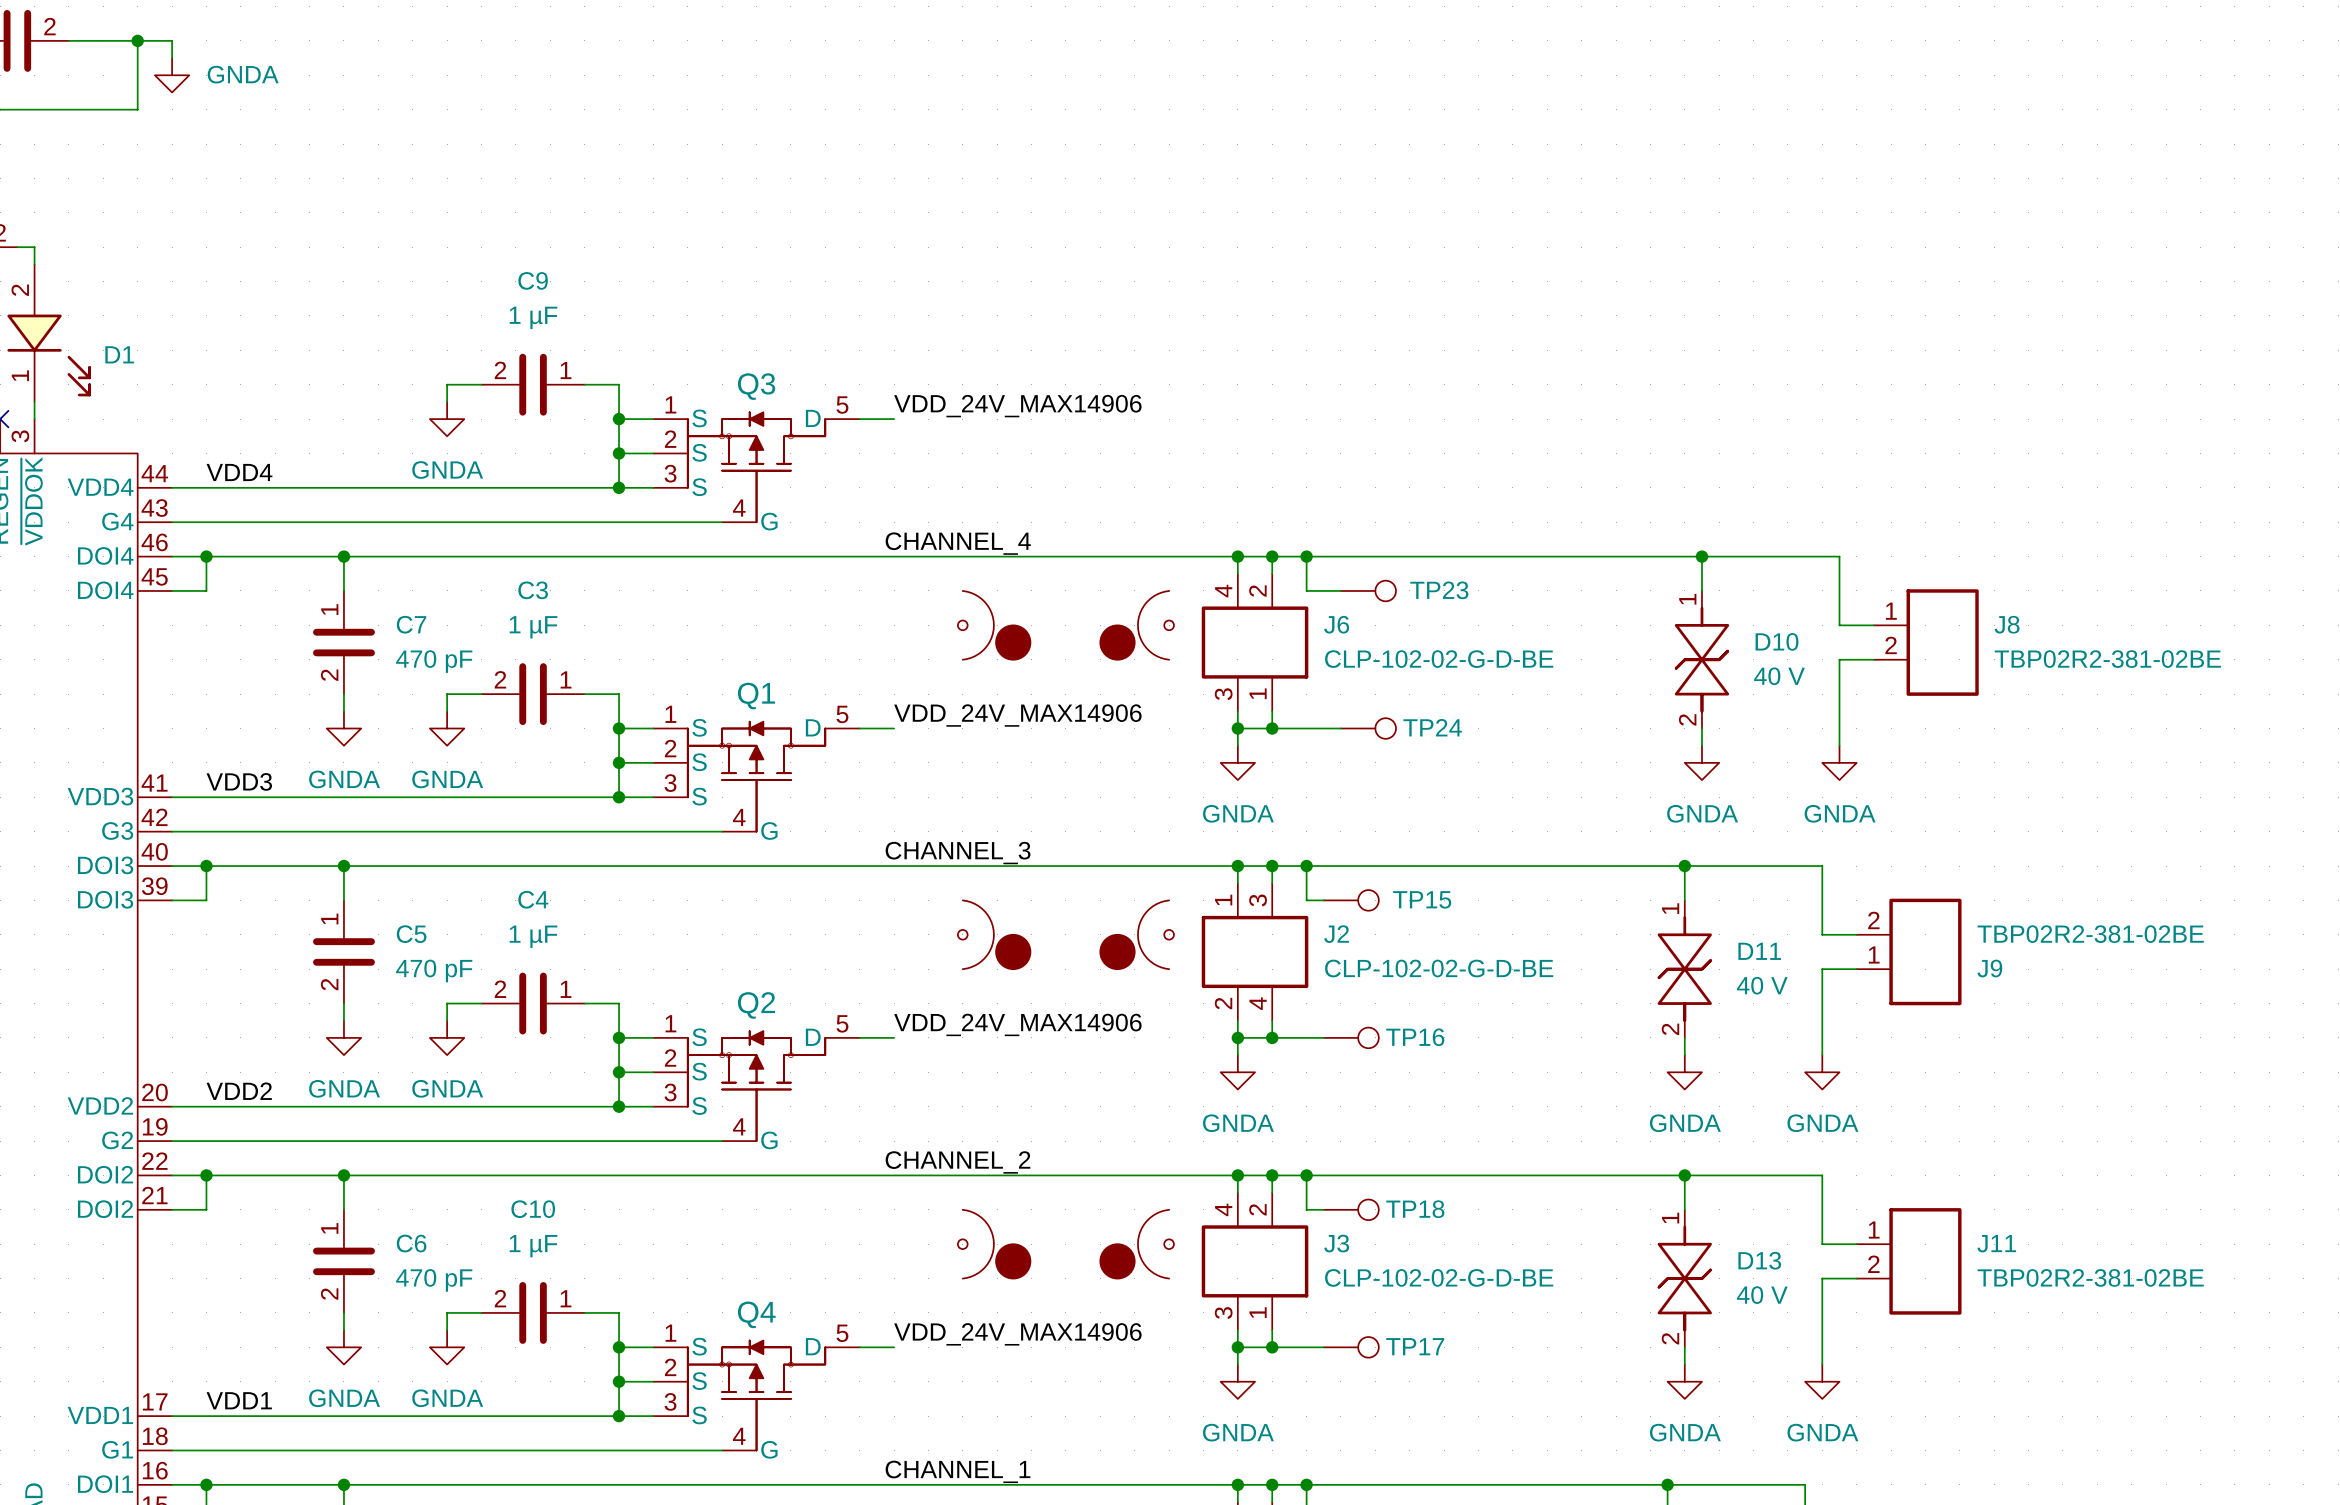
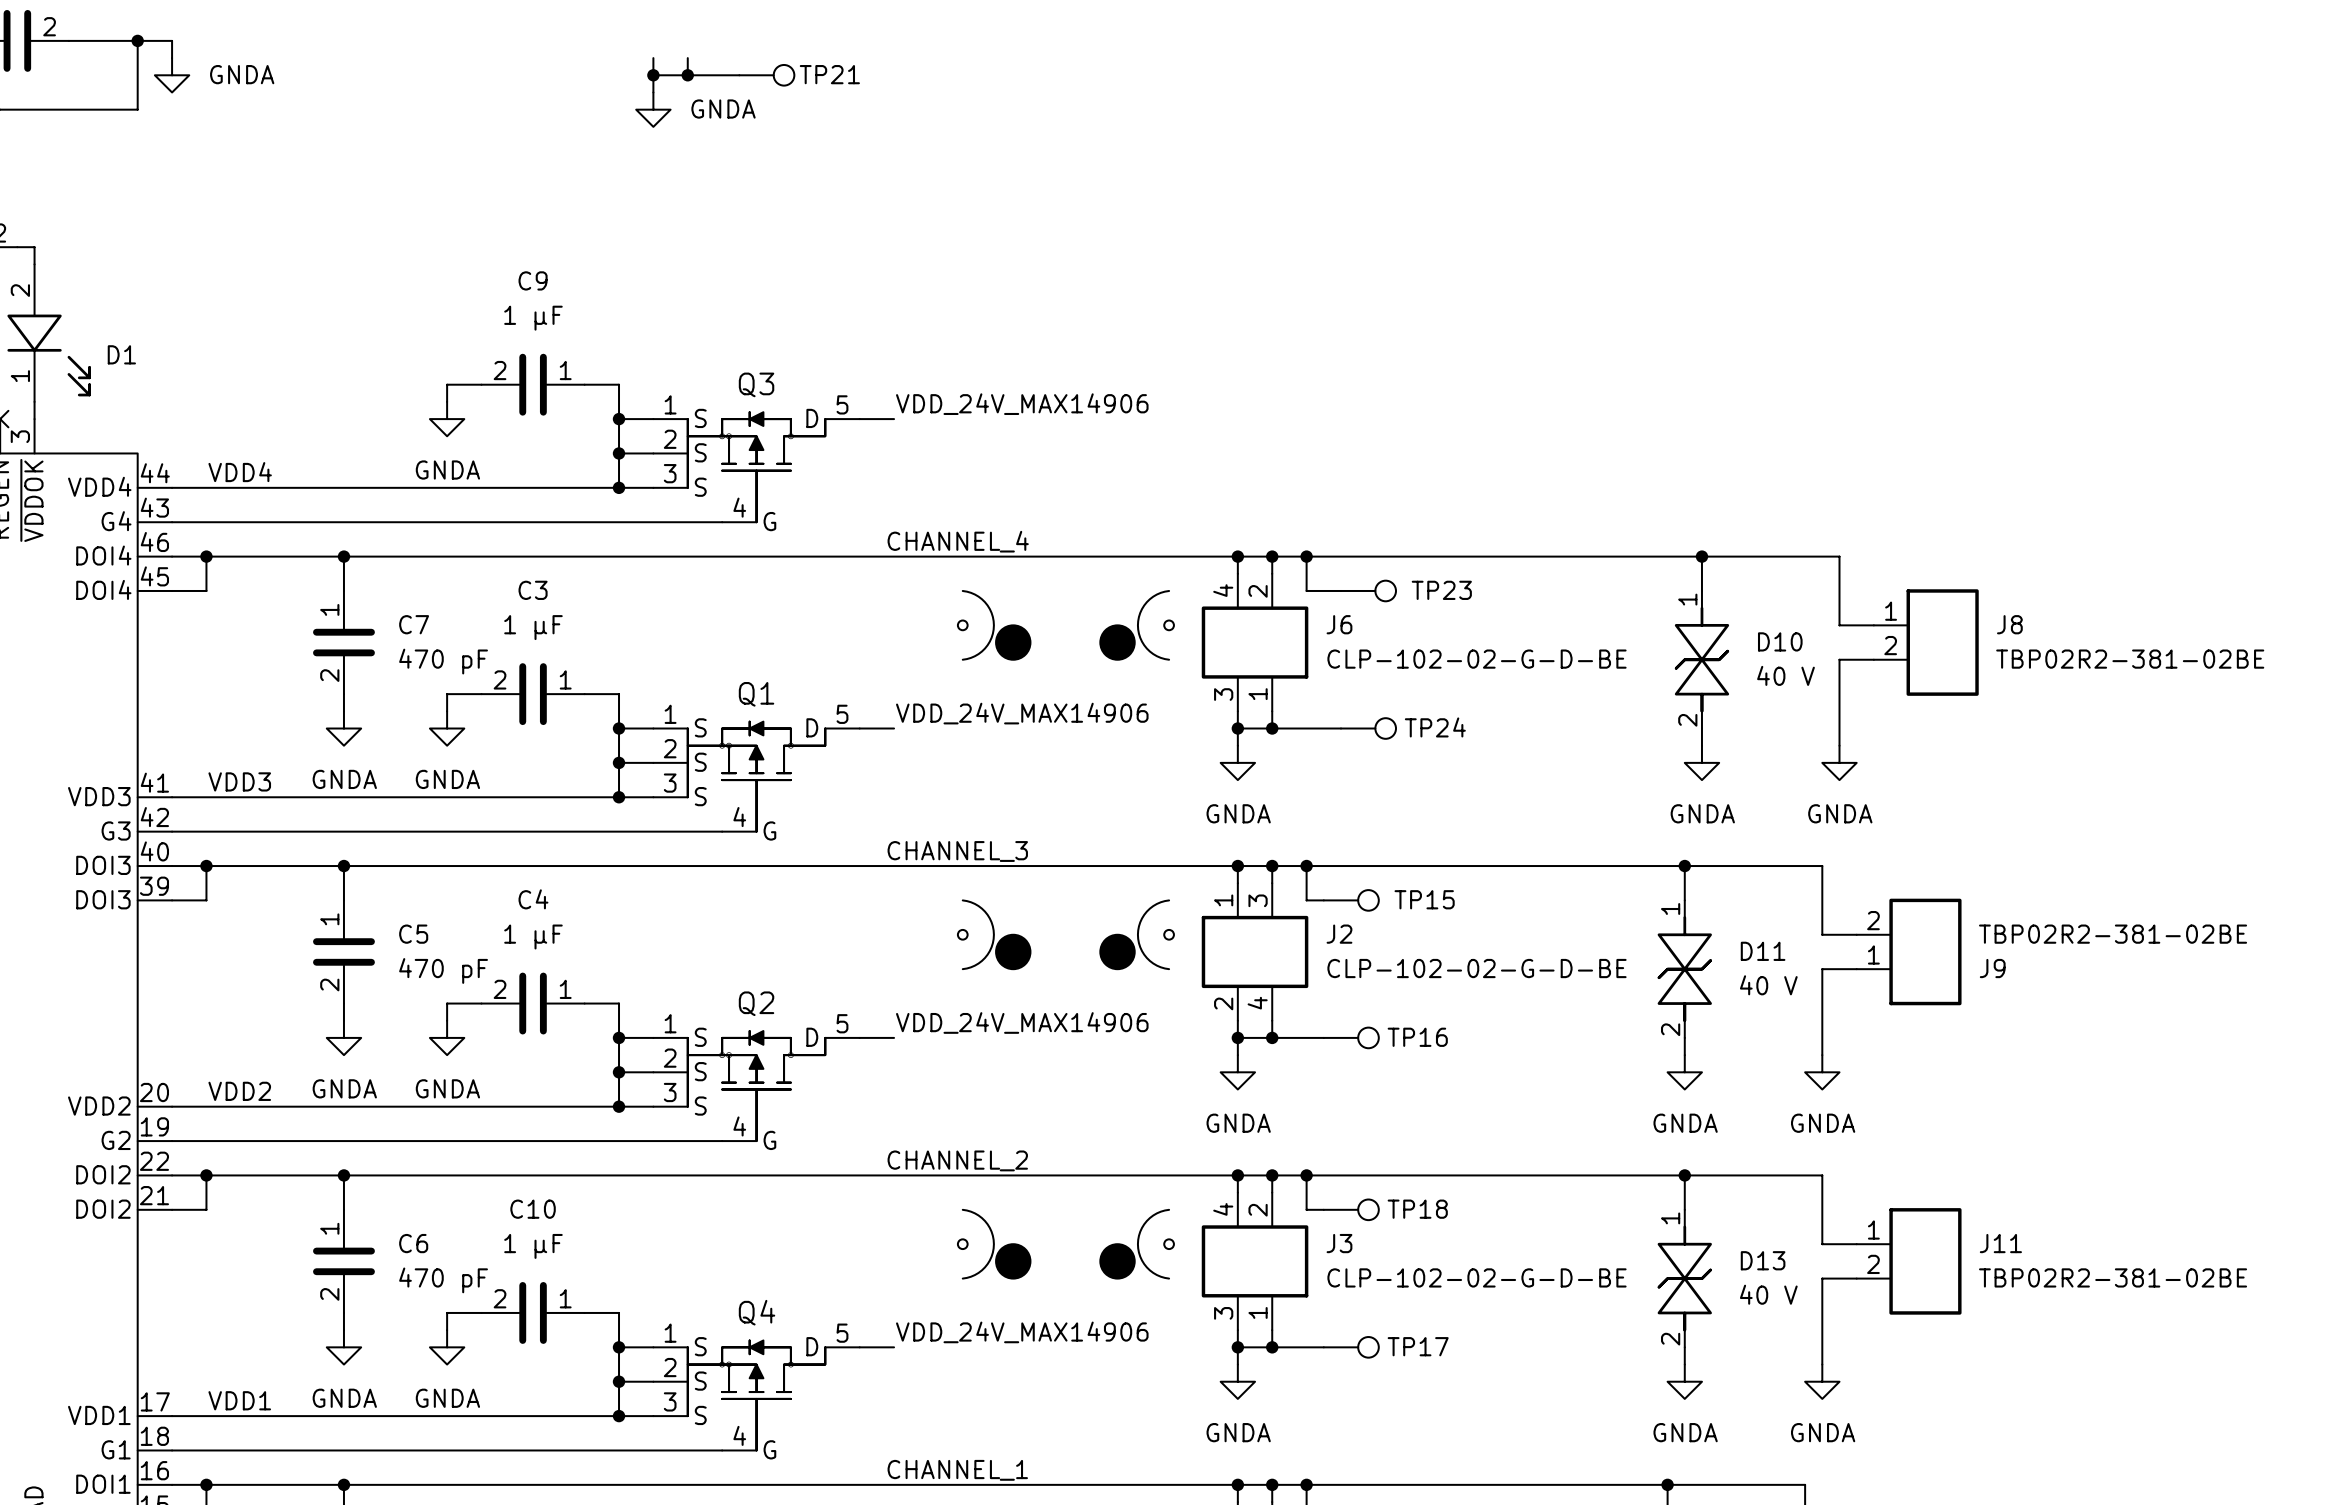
wire: none -> (653, 58) (653, 92)
wire: none -> (687, 58) (687, 75)
wire: none -> (653, 75) (739, 75)
junction: none -> (653, 75)
junction: none -> (687, 75)
TP21: none -> (766, 75)
power symbol: none -> GNDA (653, 109)

